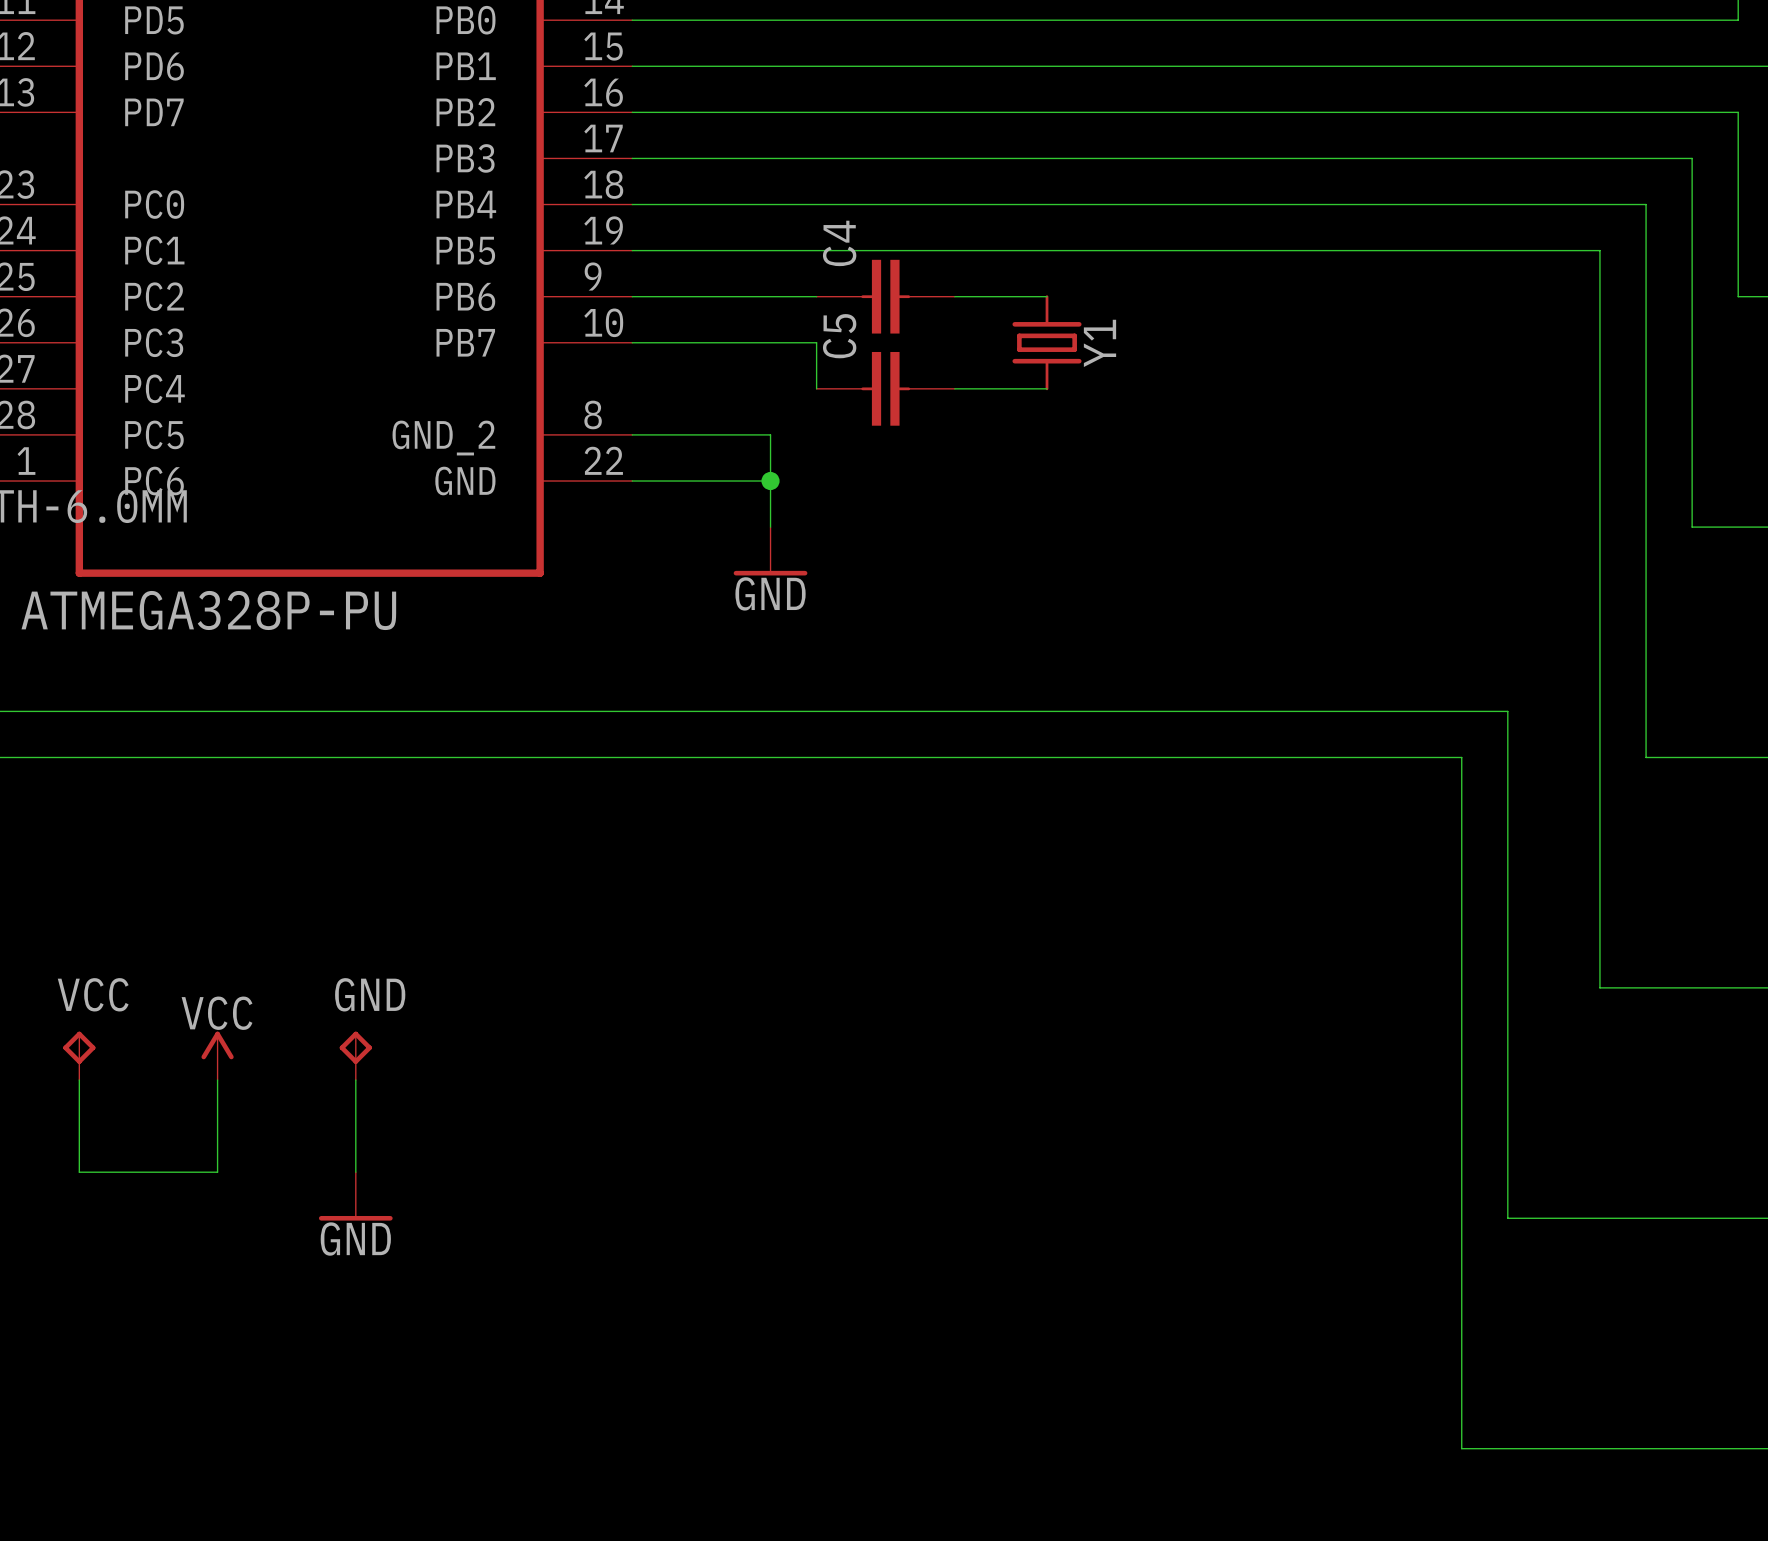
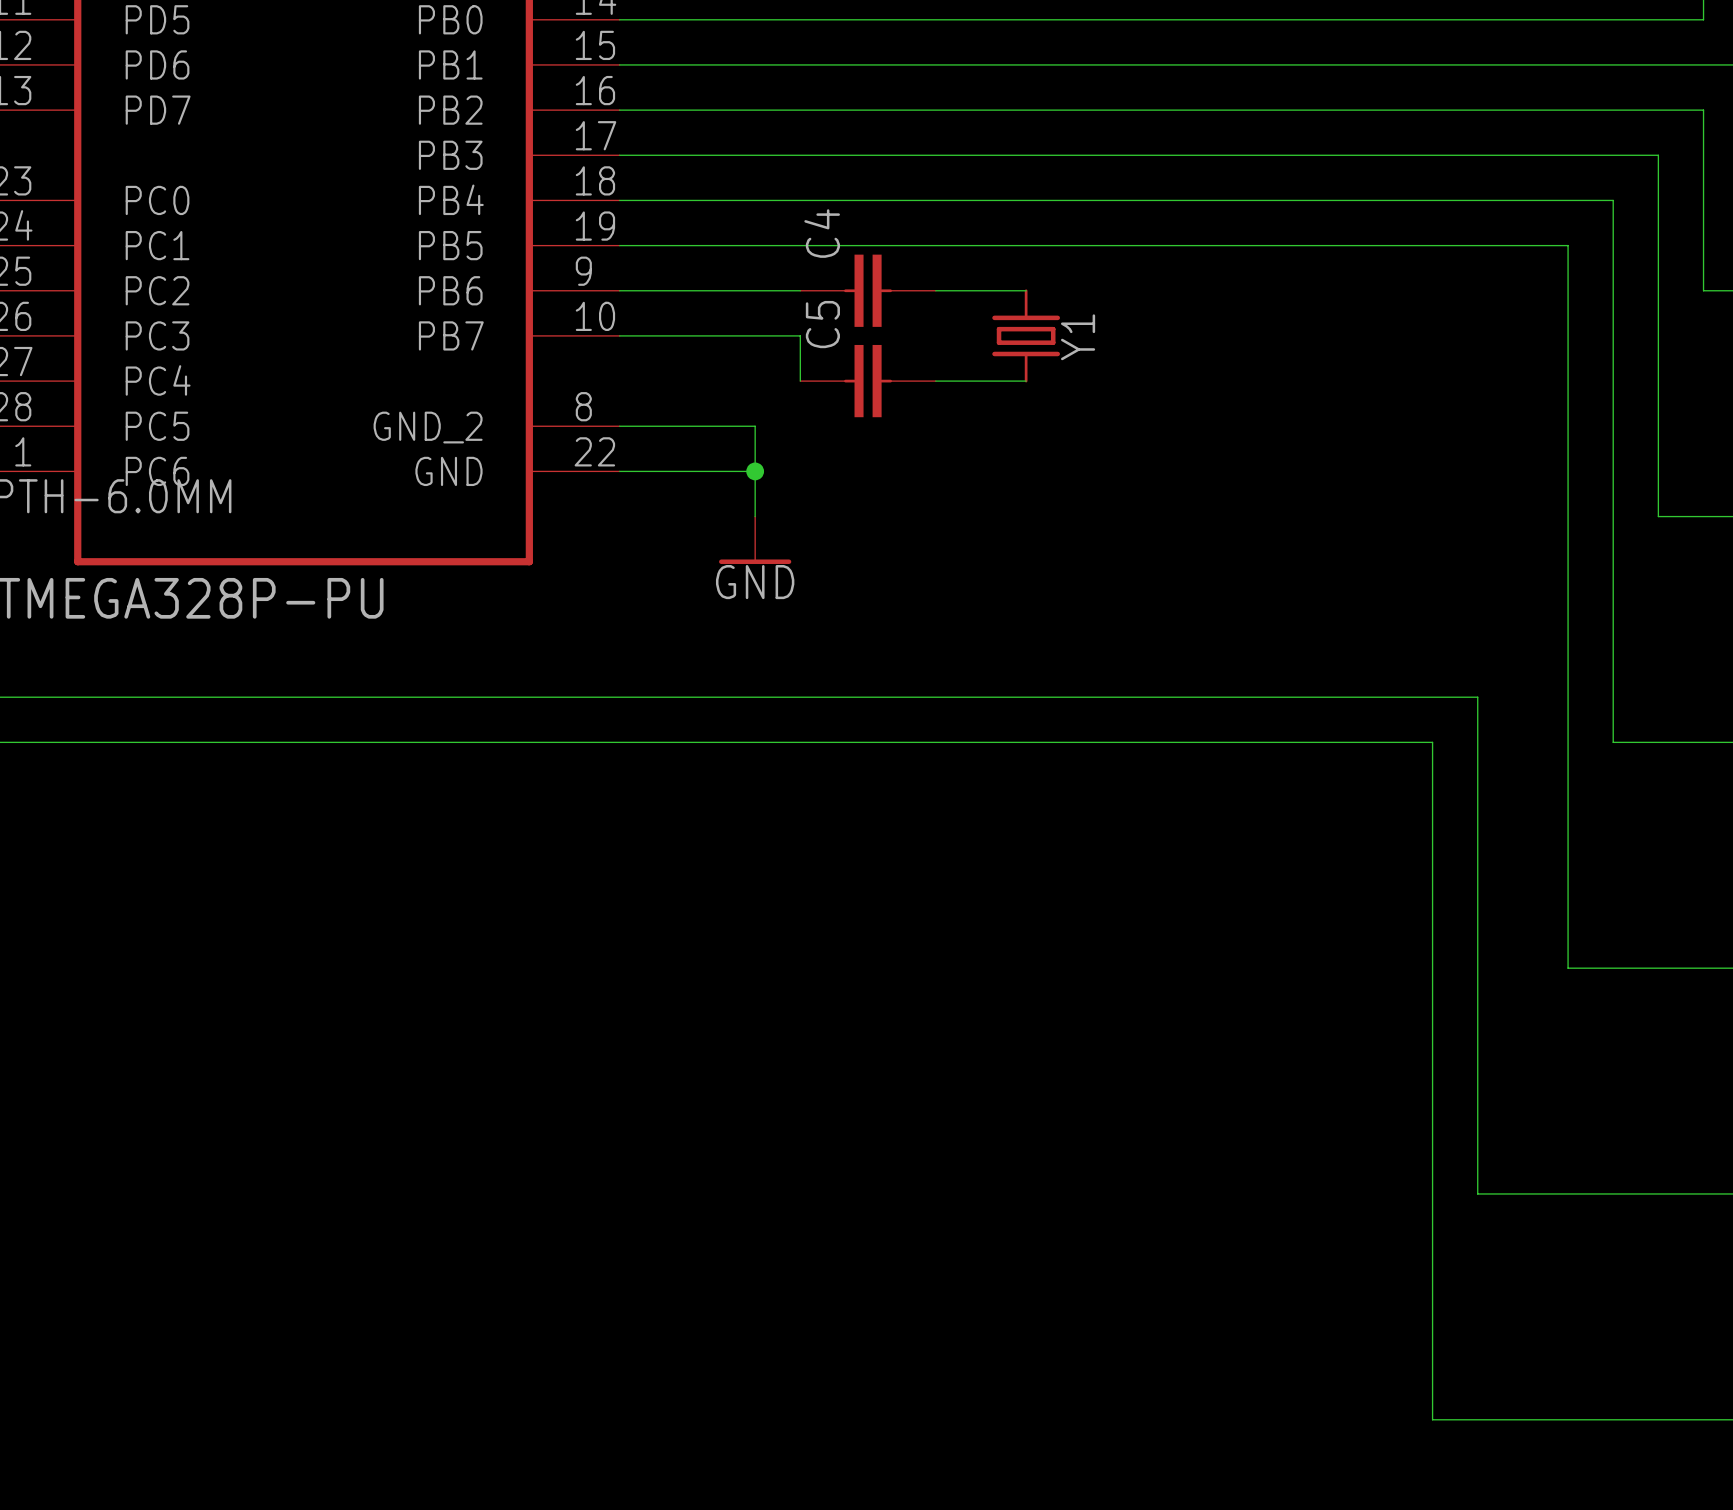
VCC: (79, 1055) -> none
power symbol: VCC (217, 1055) -> none
GND: (355, 1055) -> none
wire: (79, 1080) (79, 1172) (217, 1172) (217, 1080) -> none
wire: (355, 1080) (355, 1172) -> none
power symbol: GND (355, 1196) -> none

